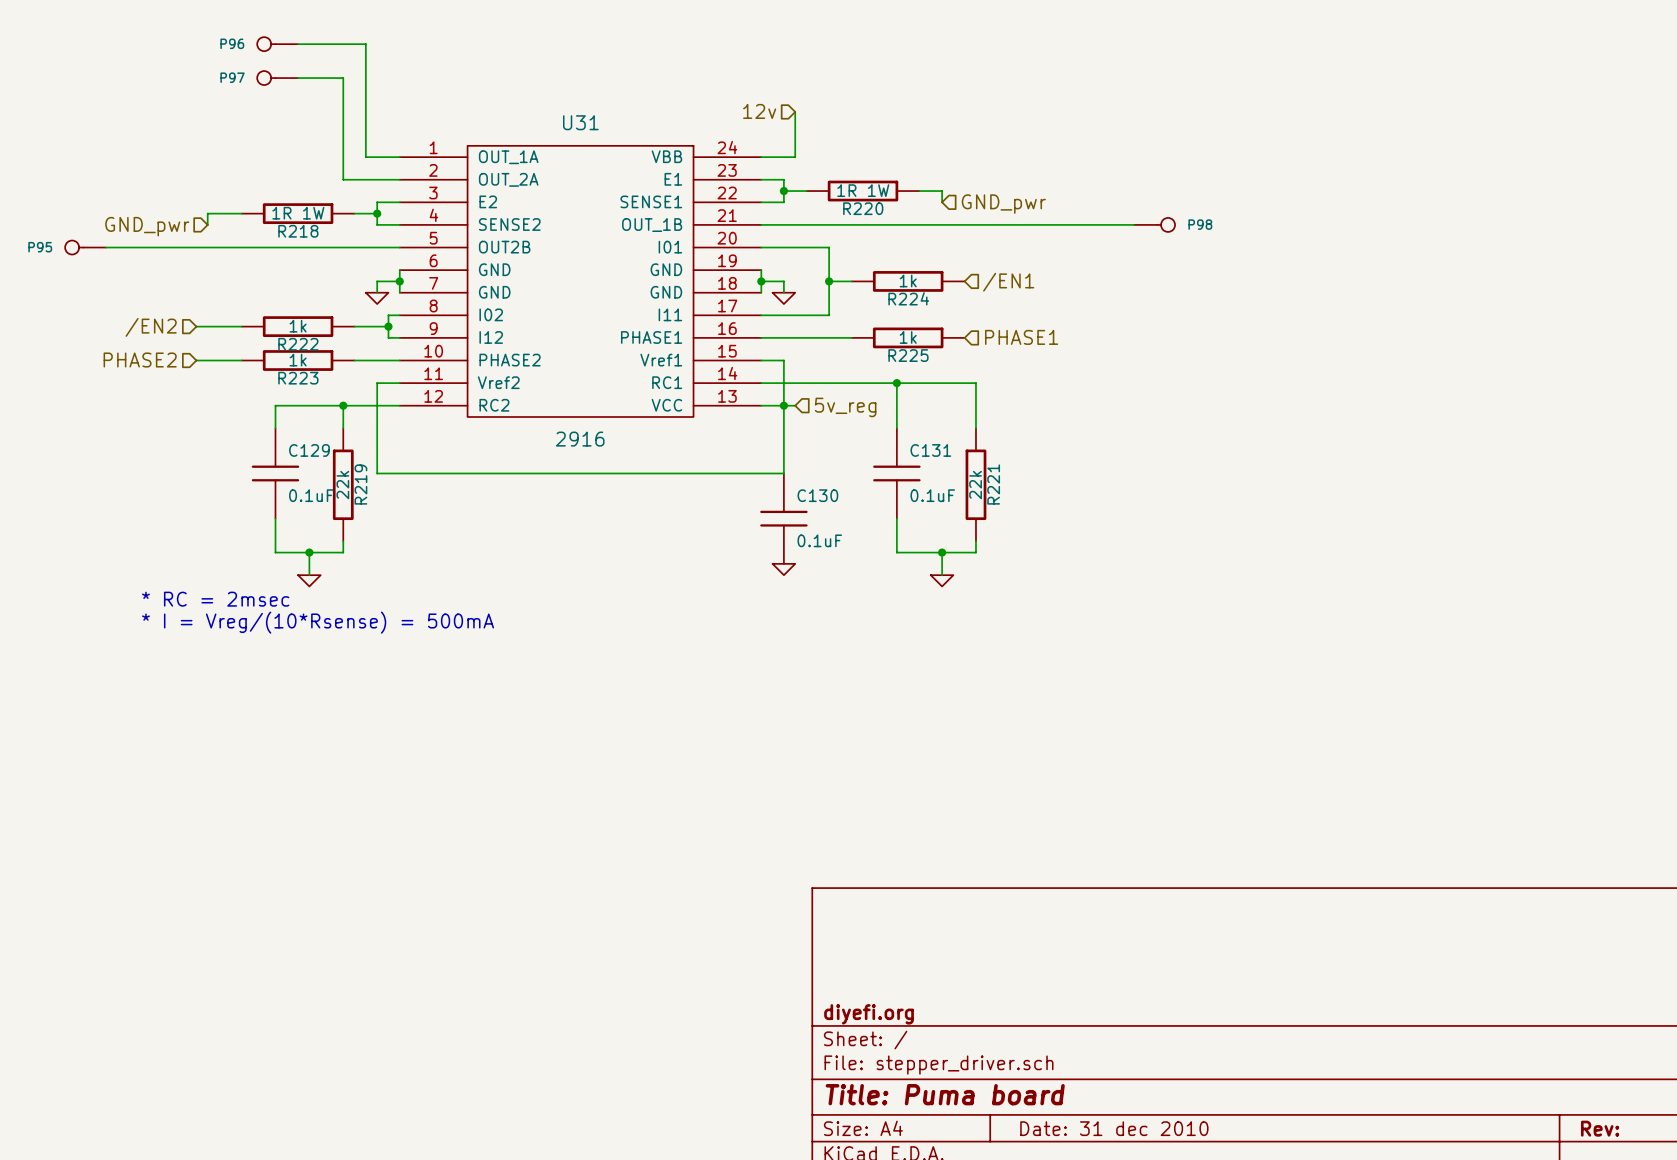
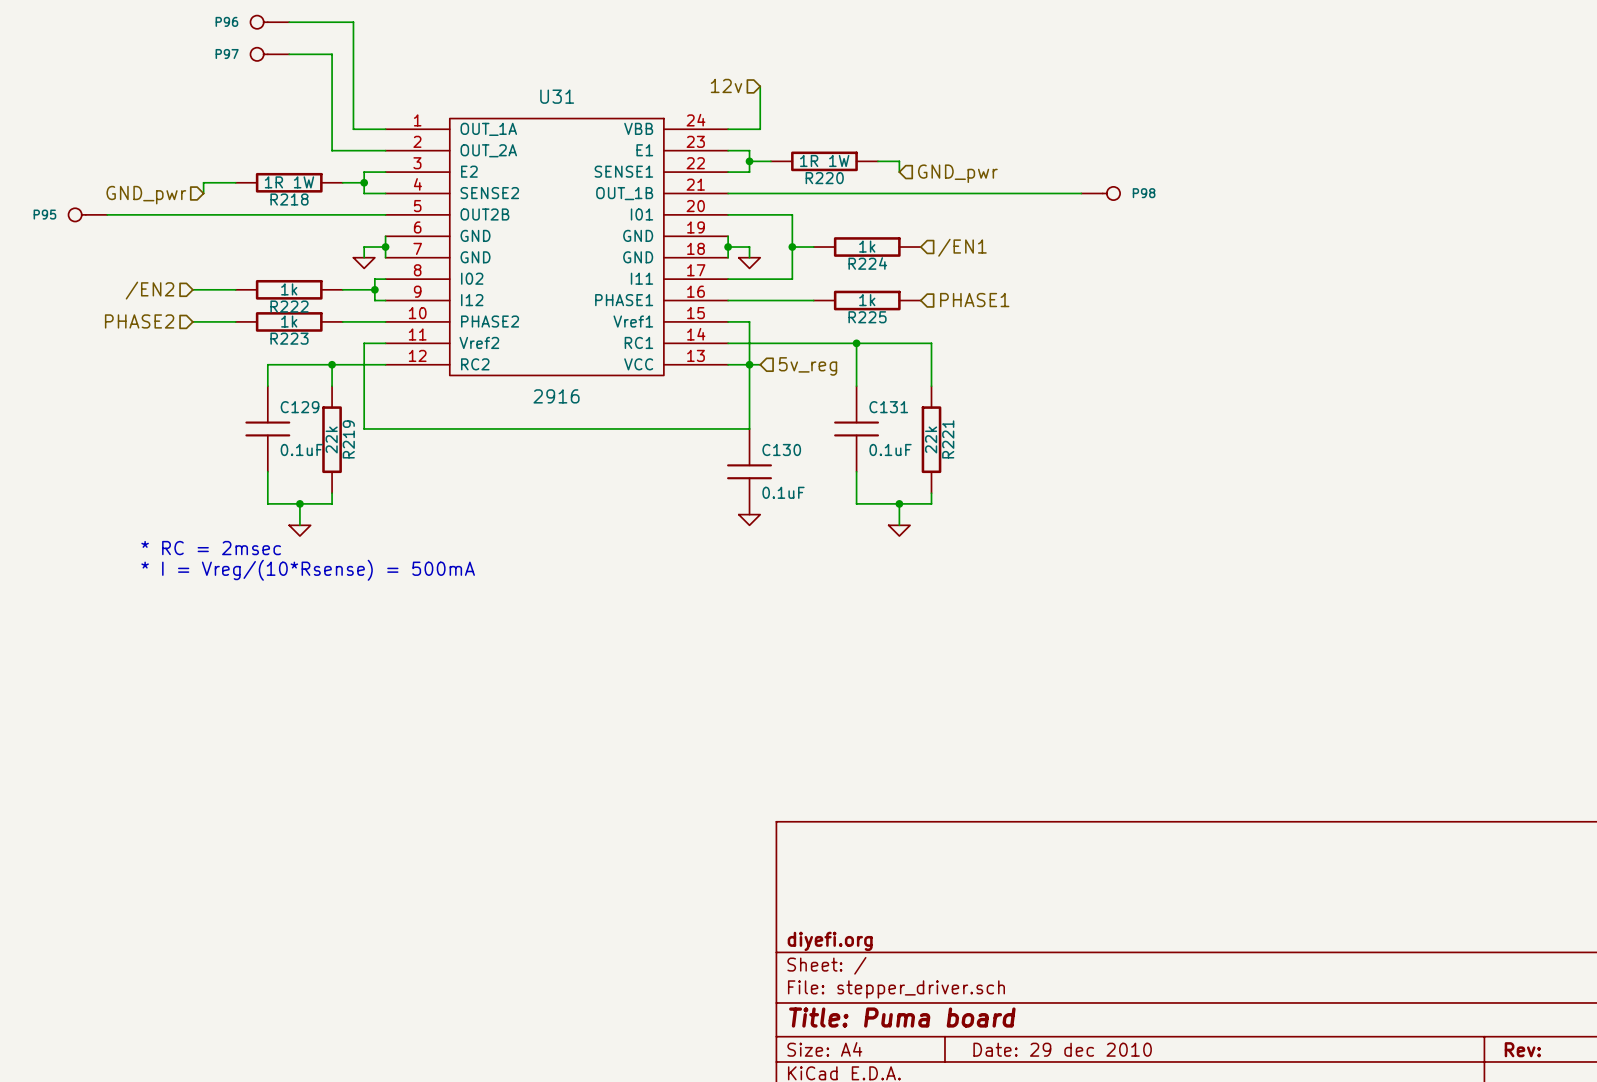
title block: Date: 31 dec 2010 (1114, 1128) -> Date: 29 dec 2010 (1062, 1049)

